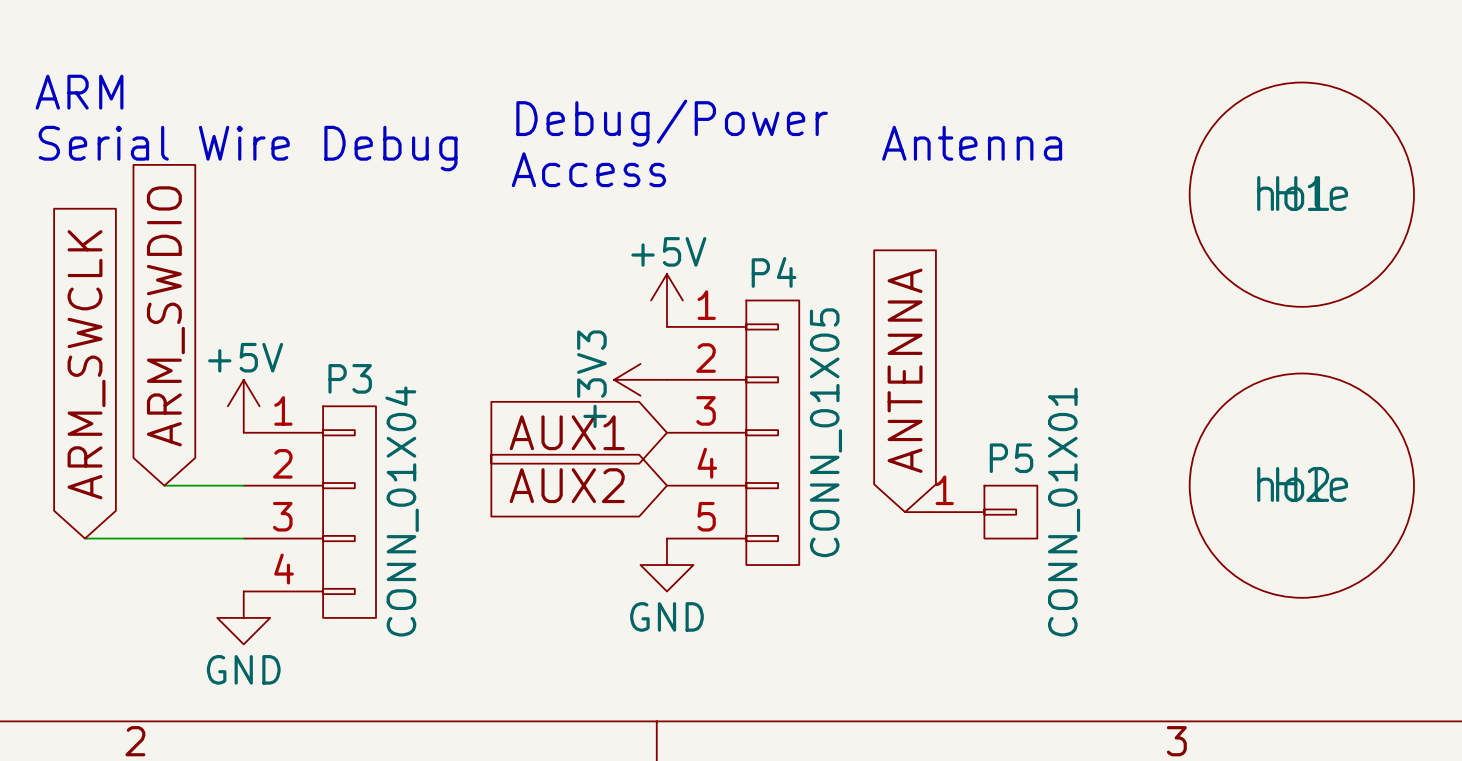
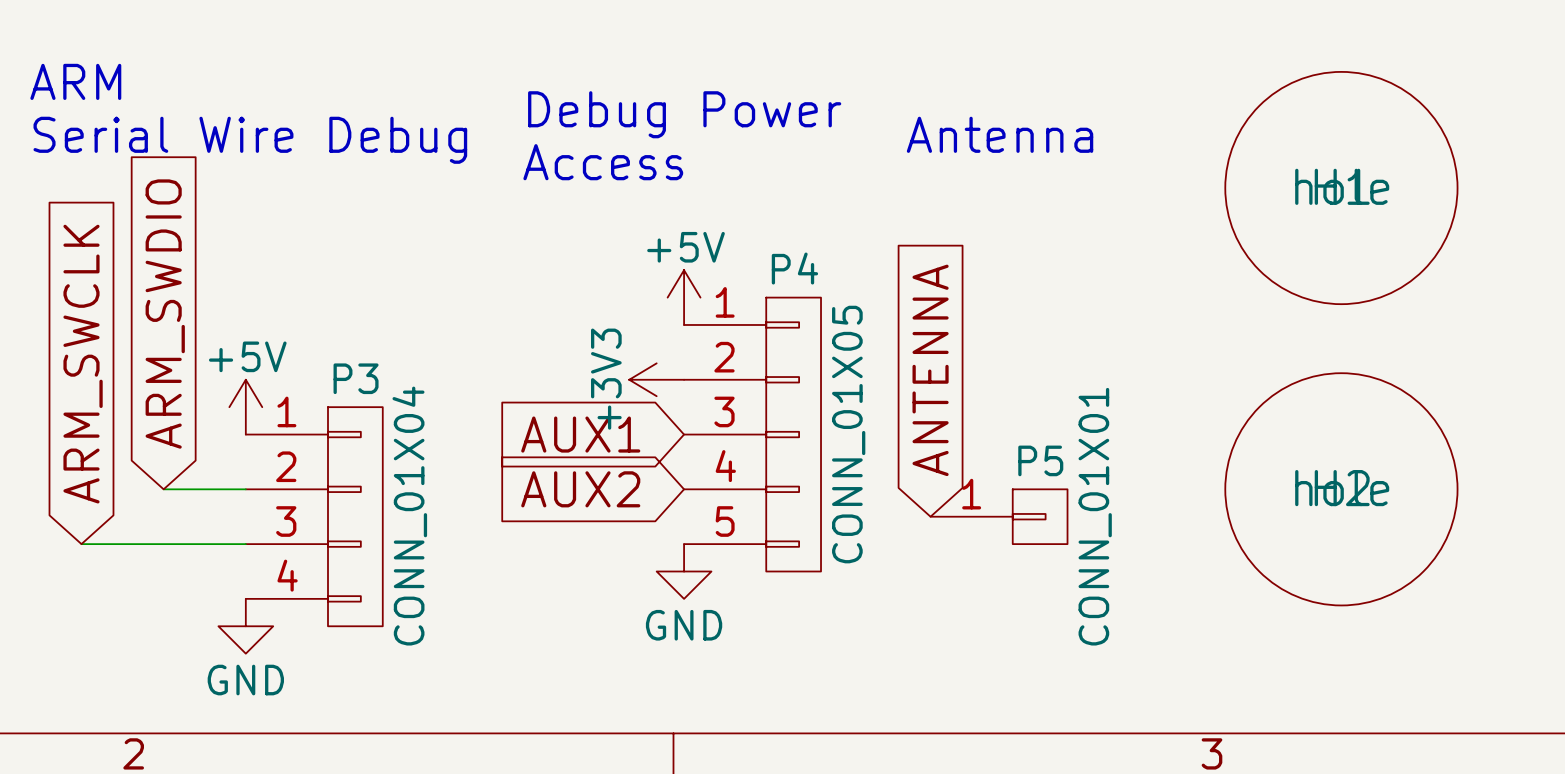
text: Debug/Power (672, 123) -> Debug Power (684, 114)

